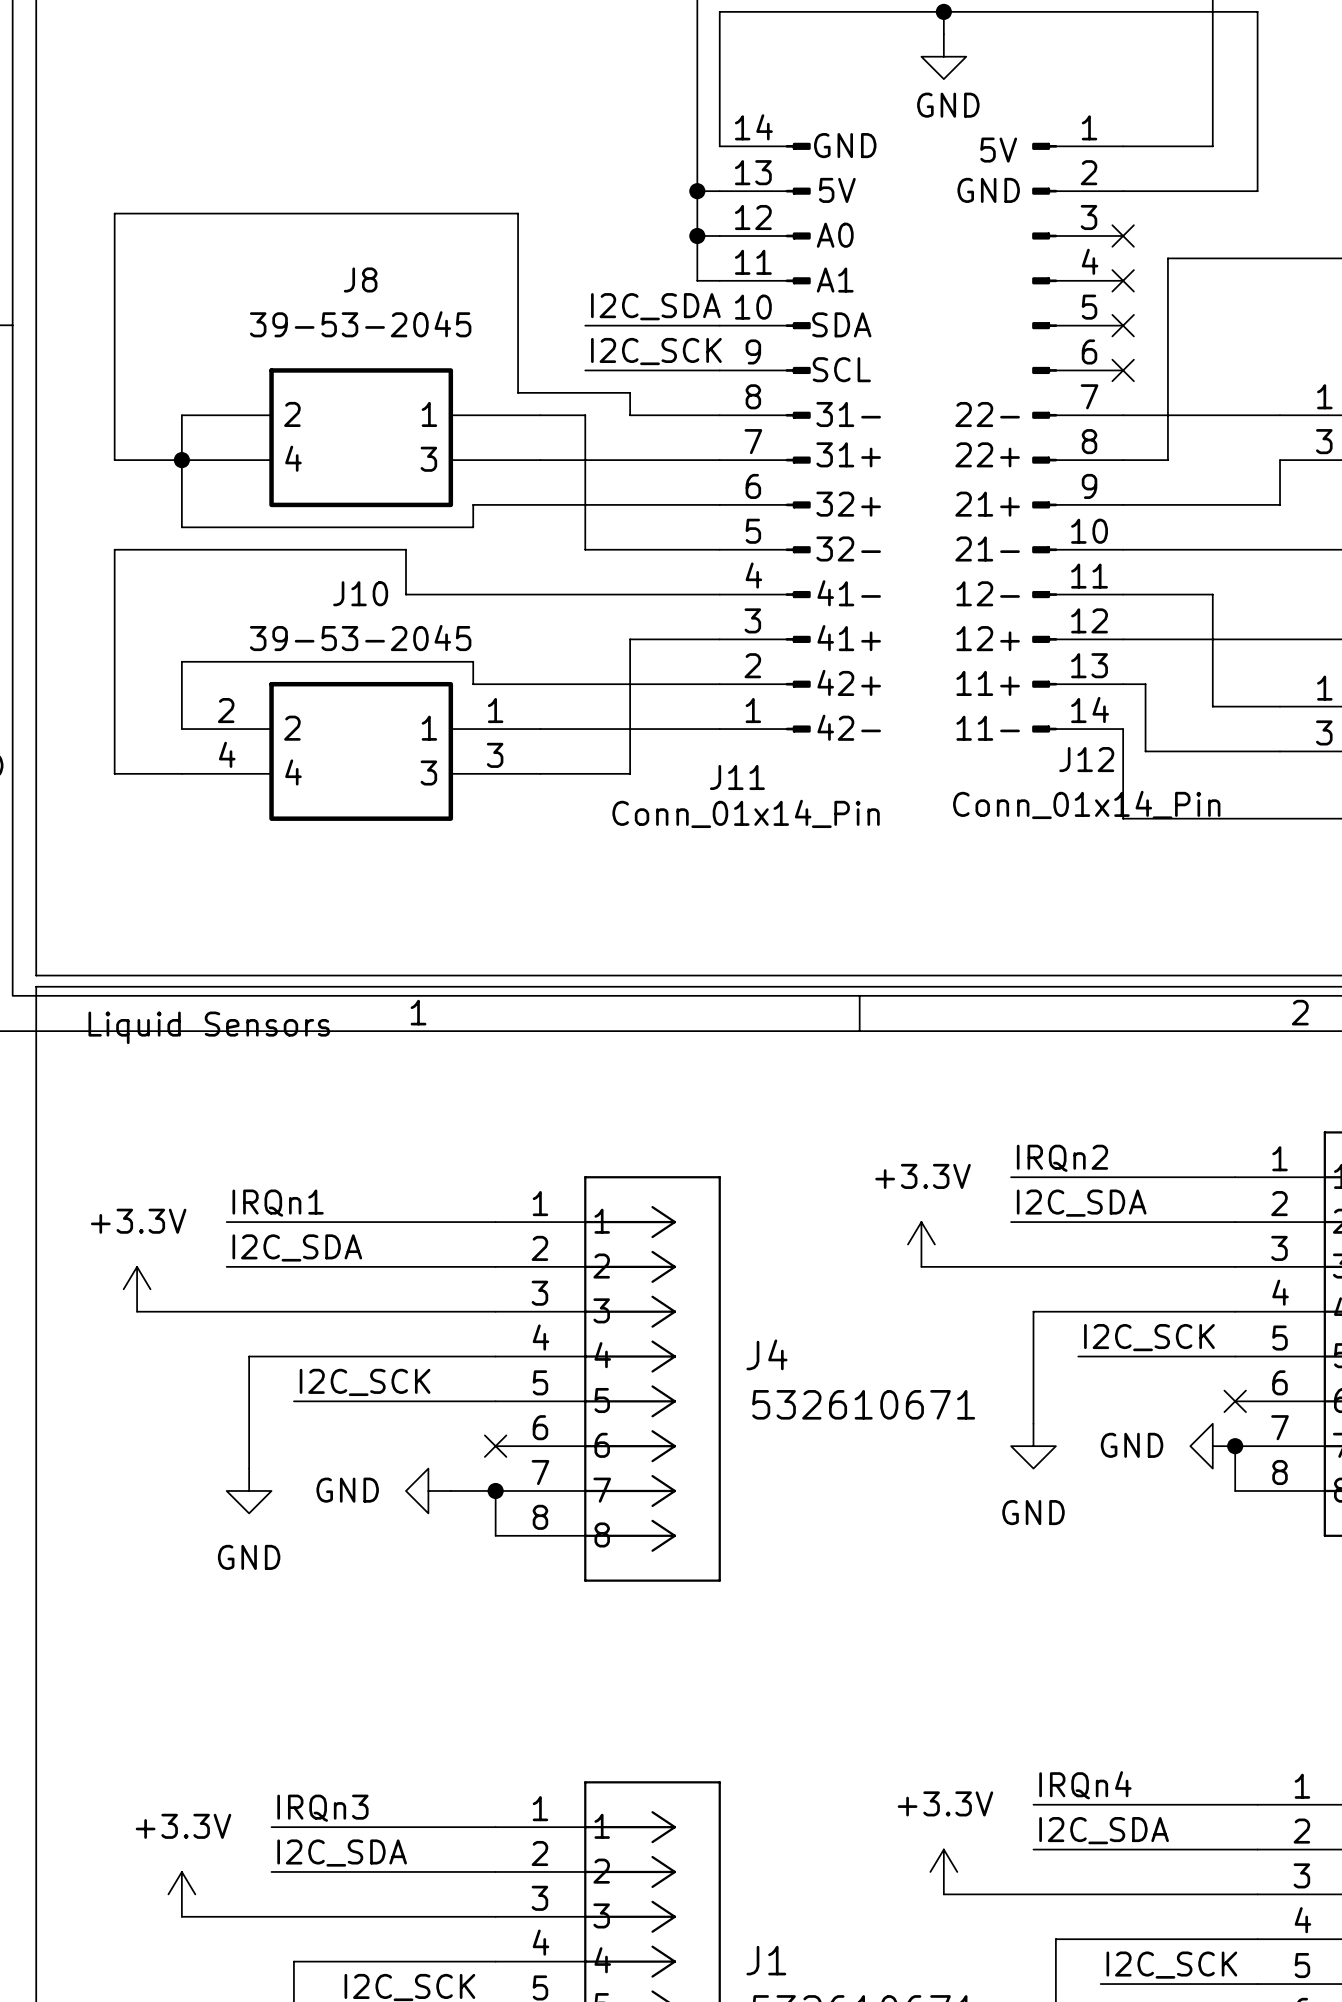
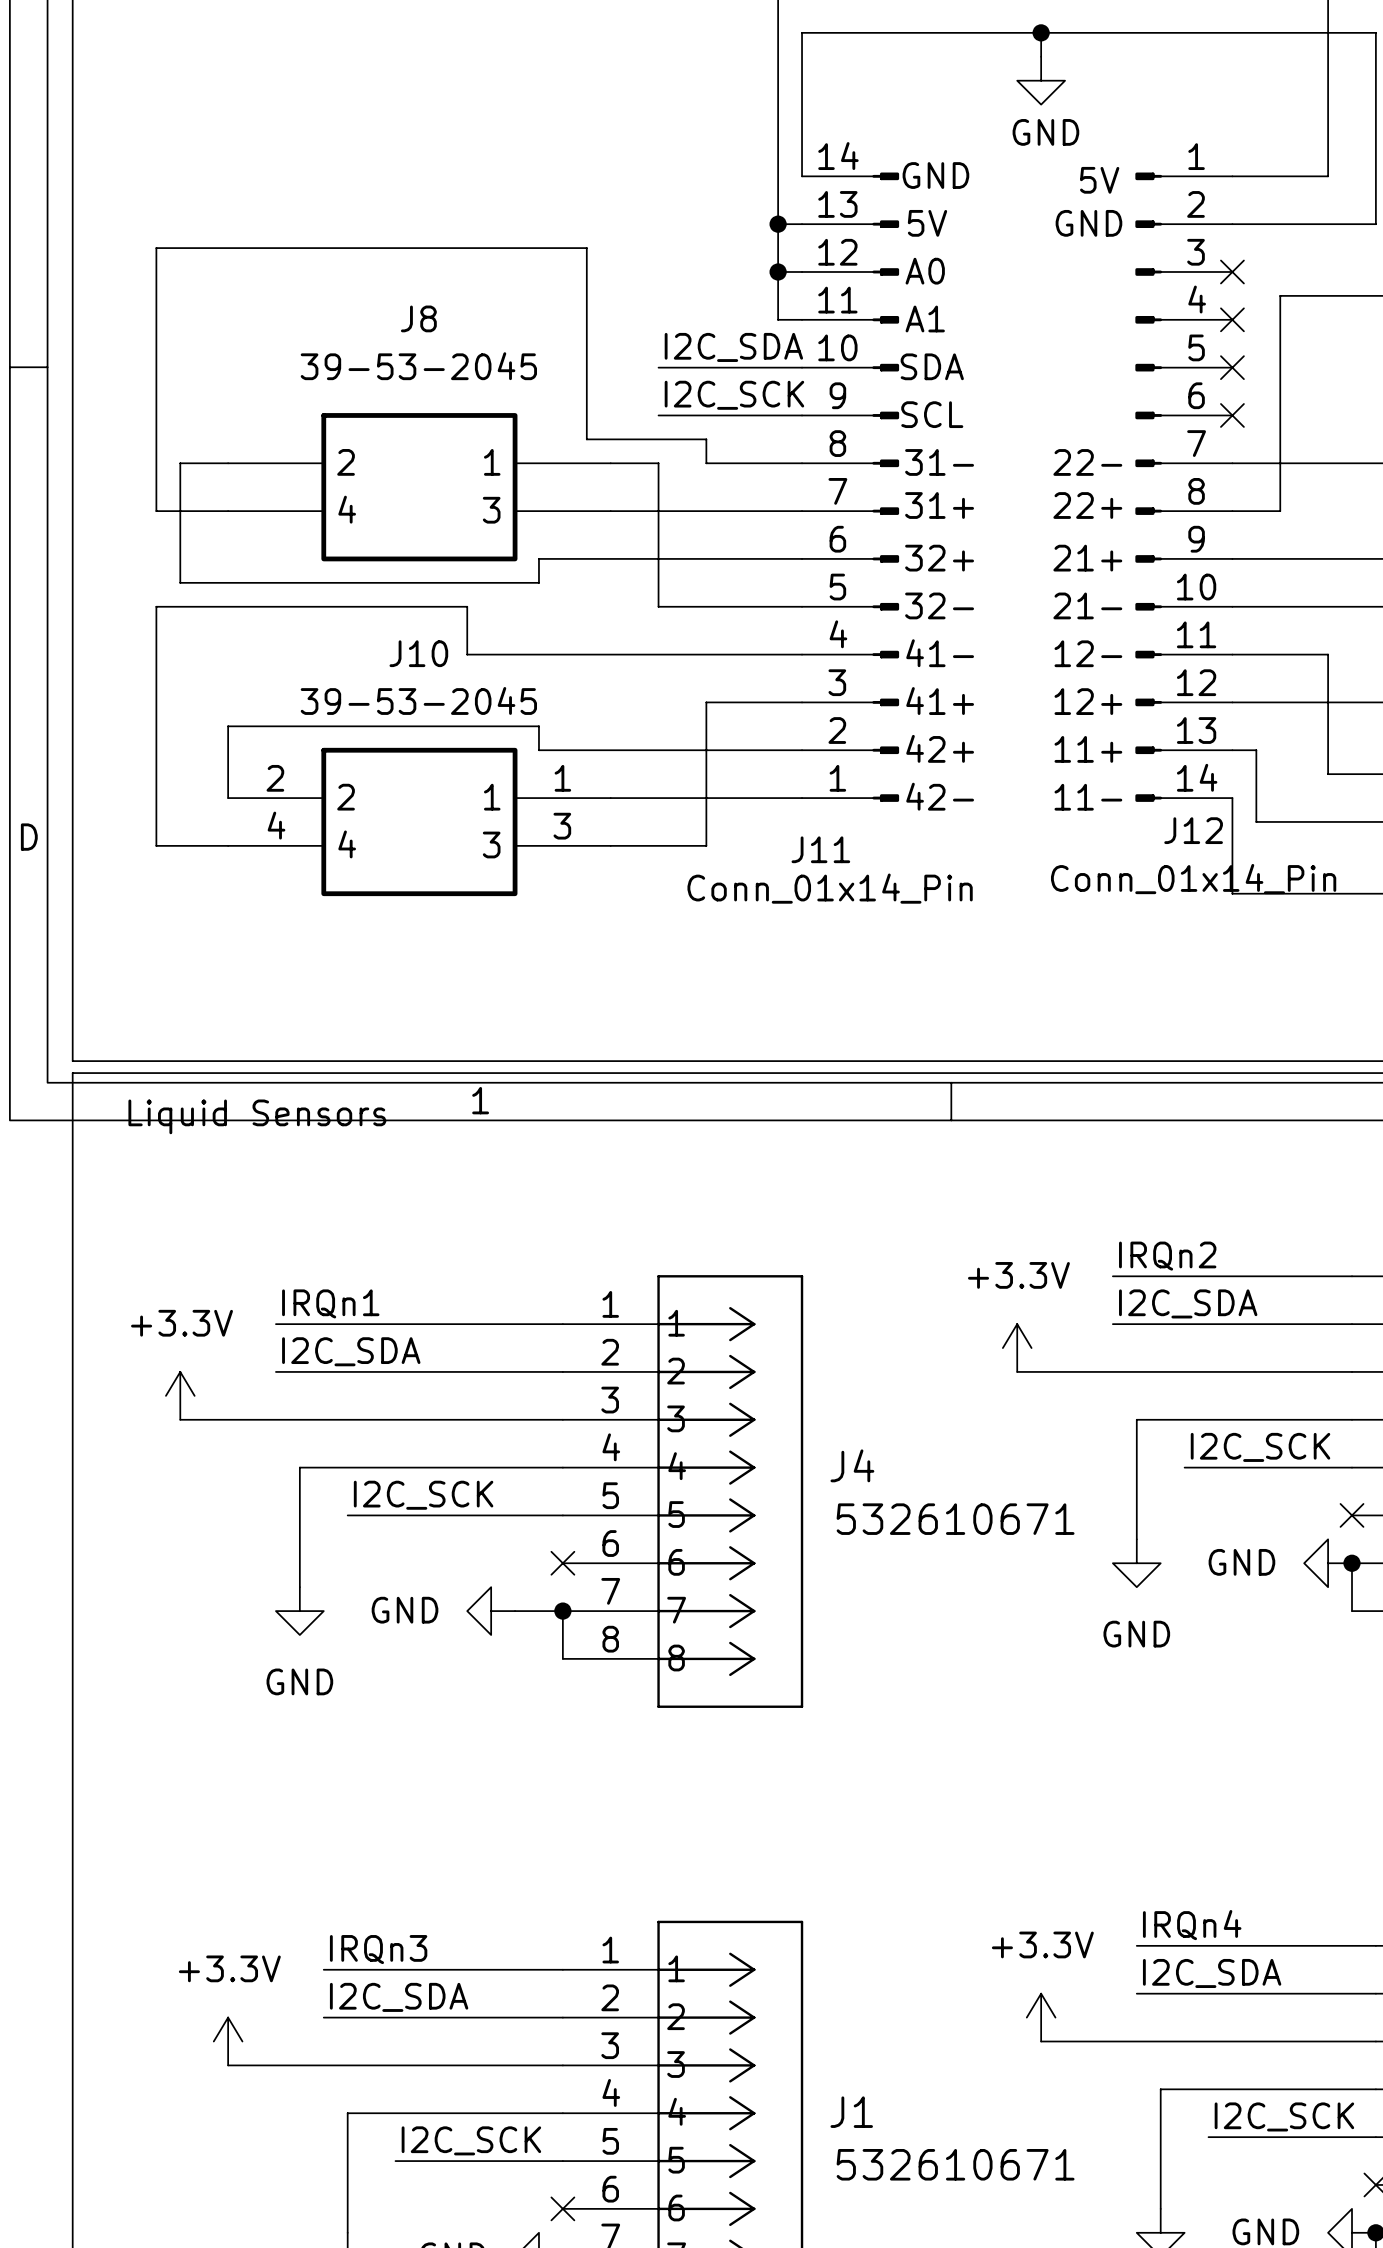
wire: (181, 415) (181, 527) -> (228, 463) (180, 463) (180, 582) (228, 582)
junction: (181, 460) -> none

